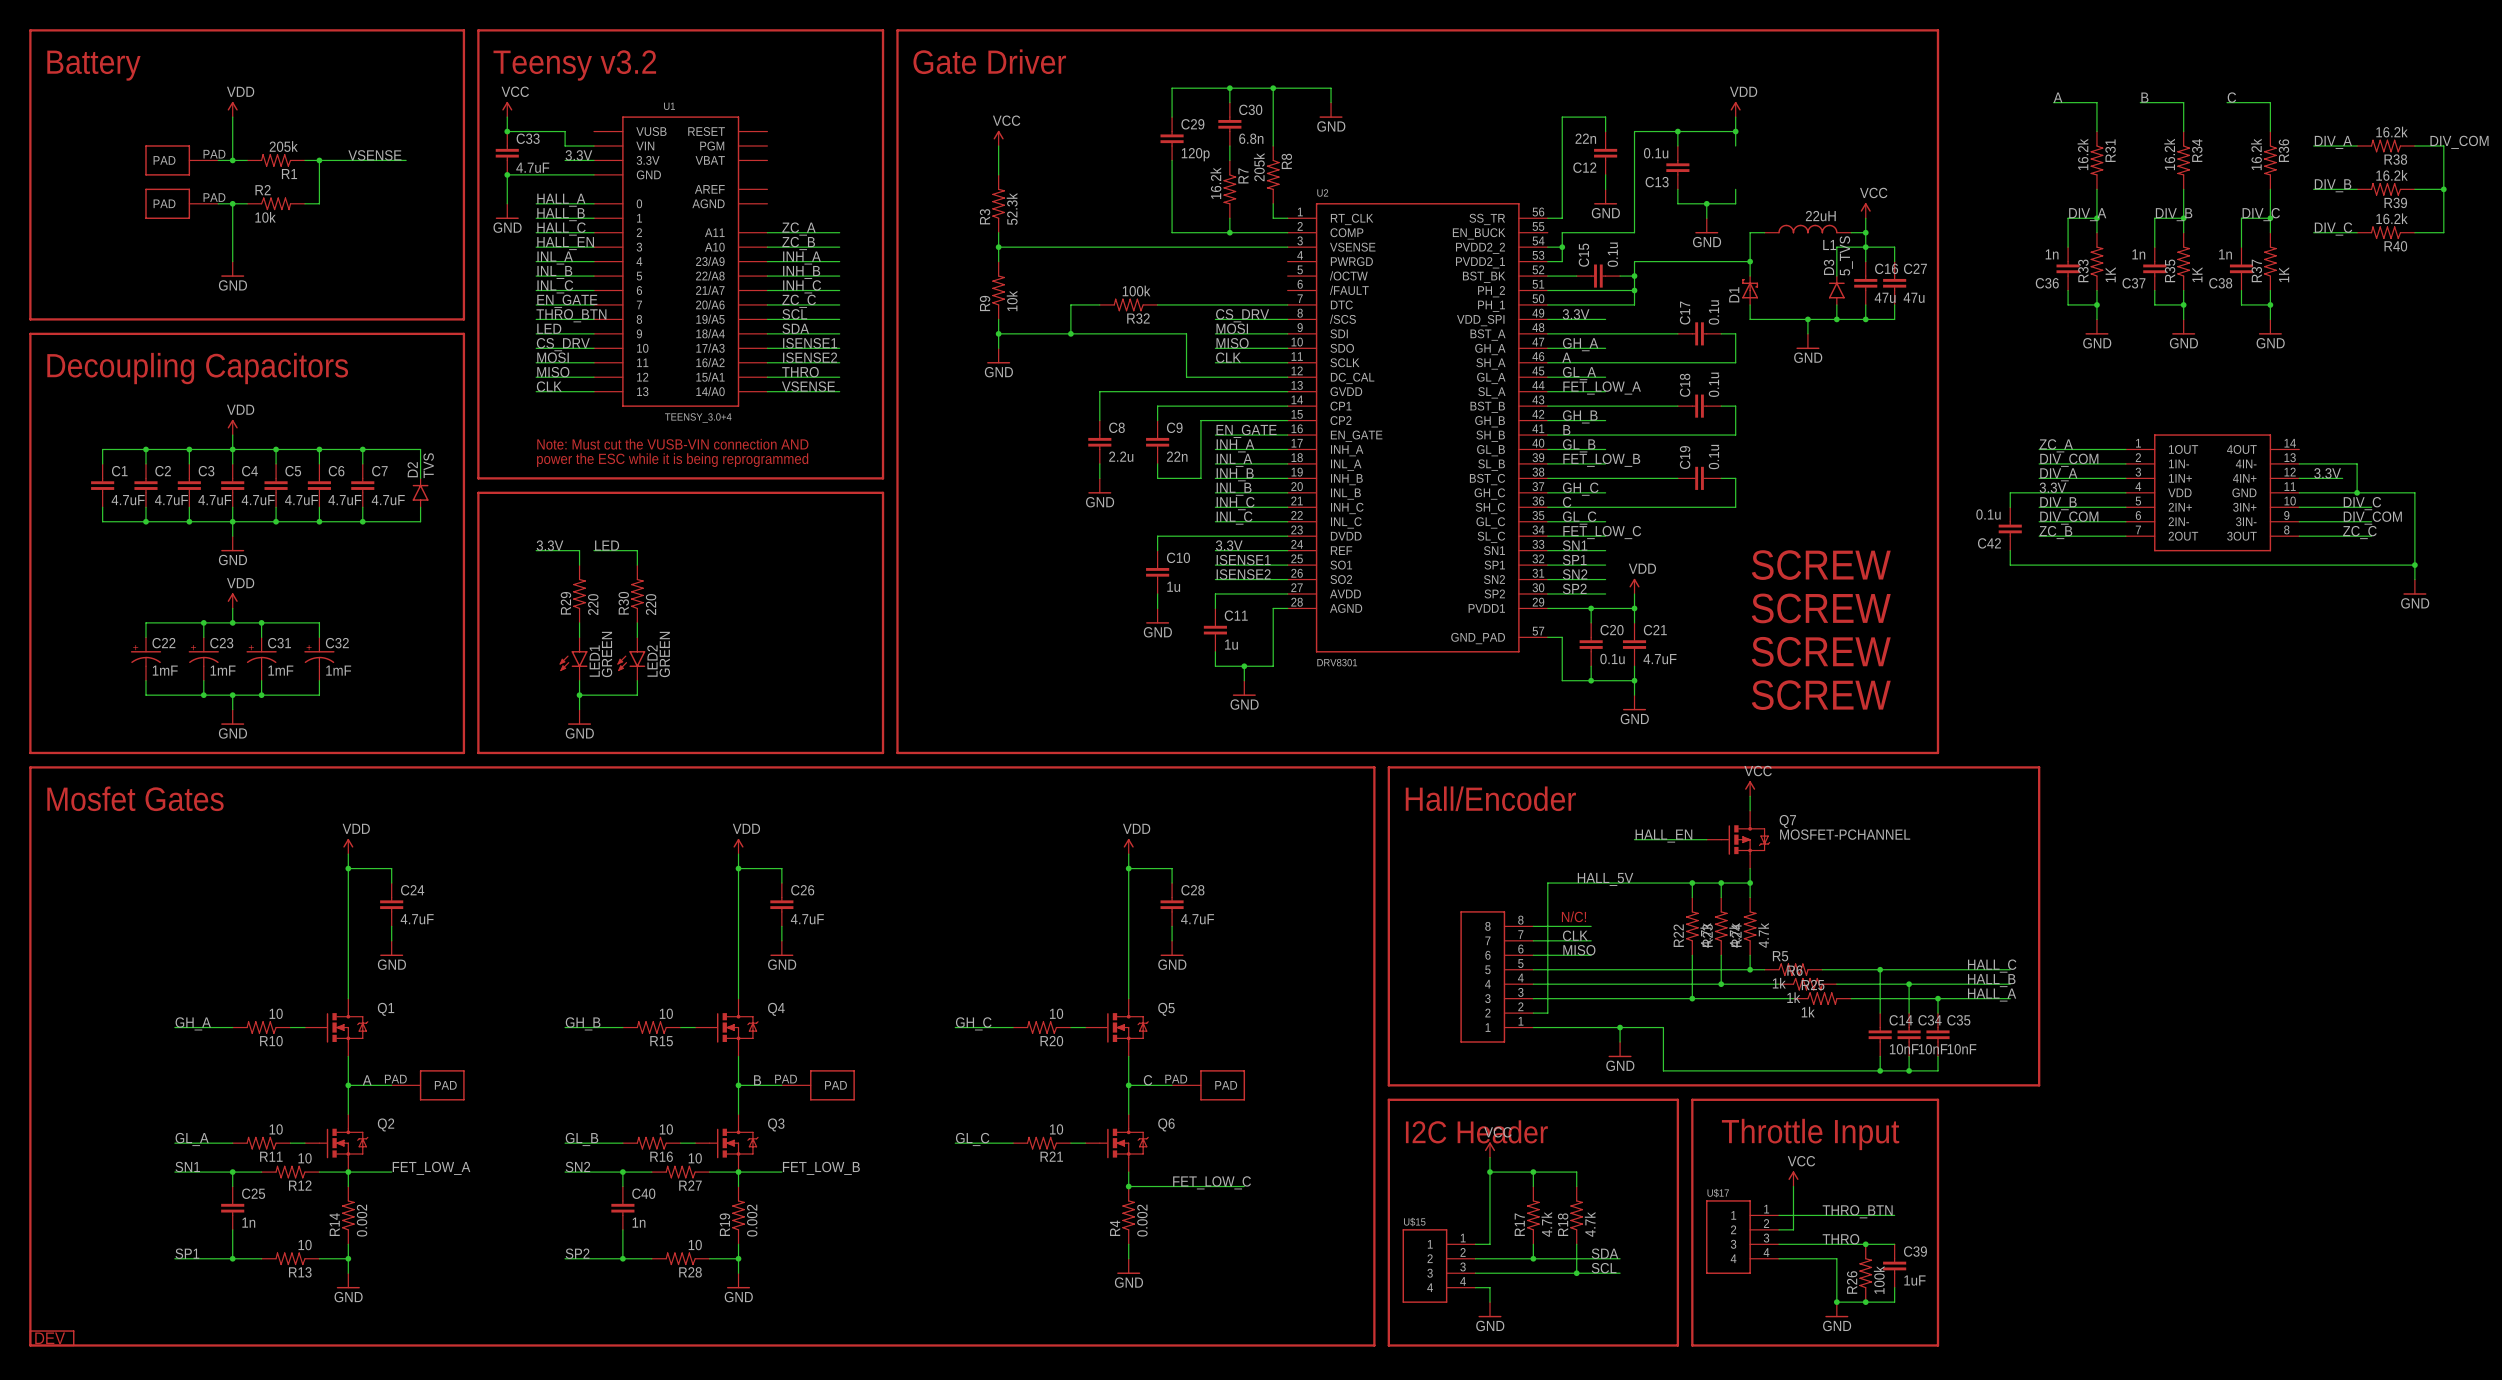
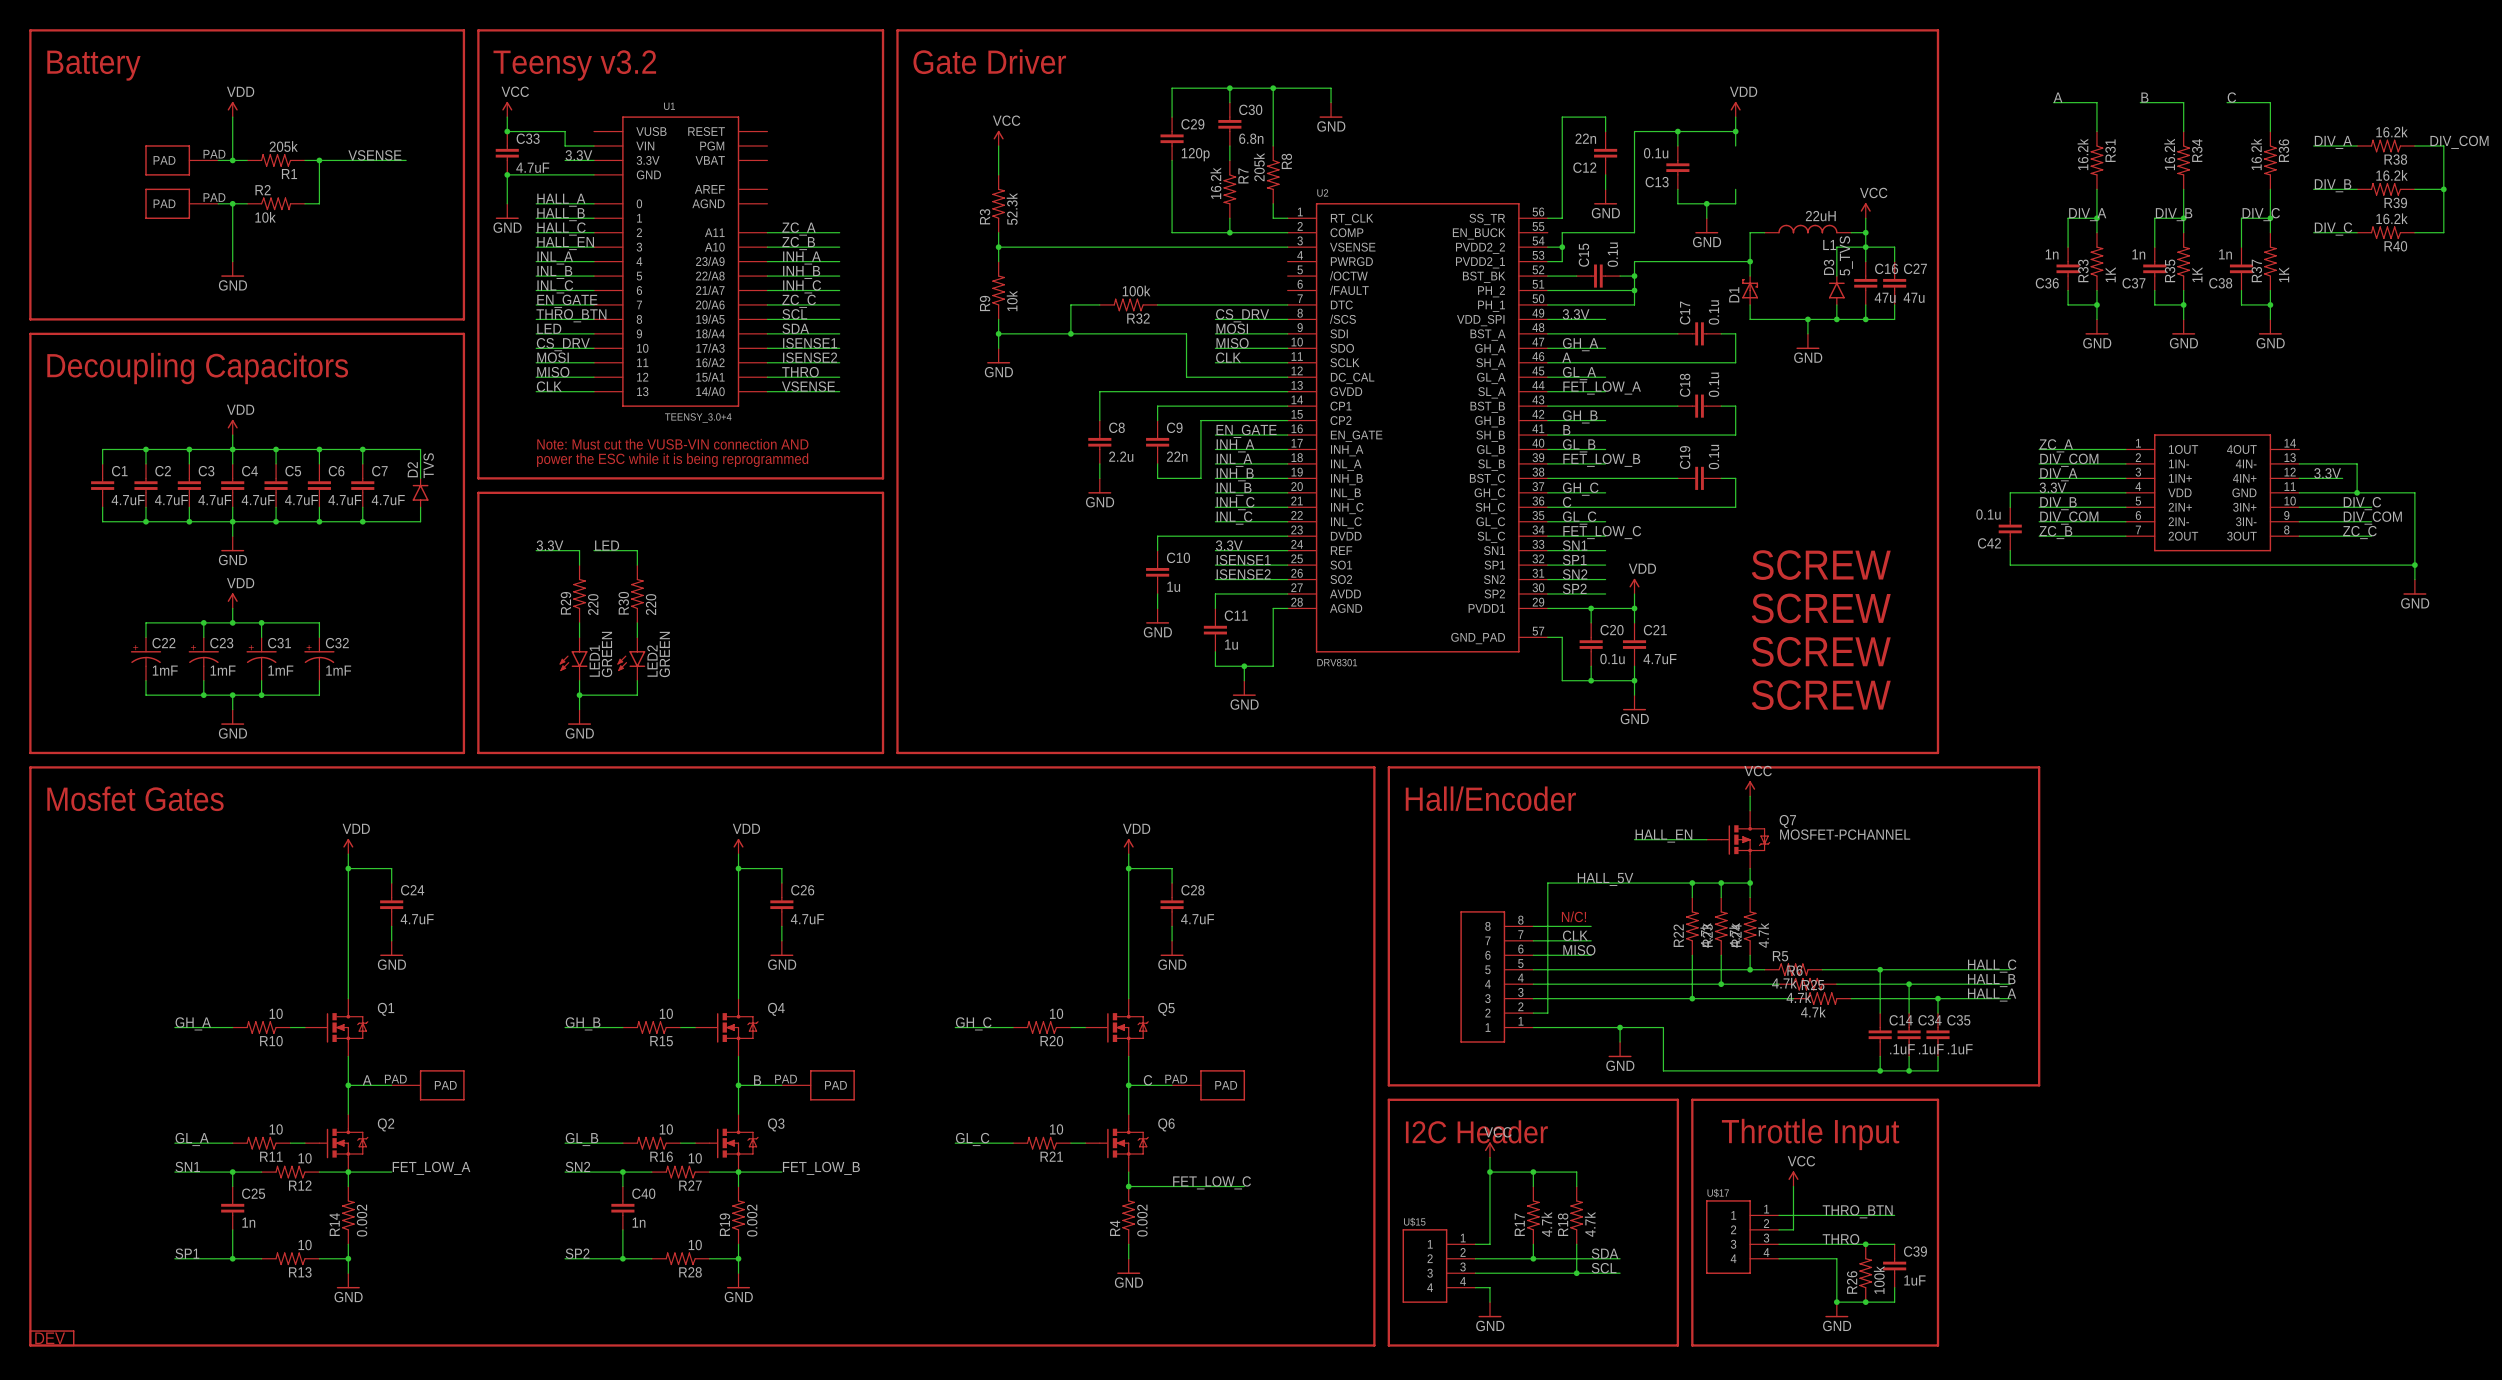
R5 value: 1k (1779, 983) -> 4.7k (1784, 983)
R6 value: 1k (1793, 997) -> 4.7k (1798, 997)
R25 value: 1k (1808, 1012) -> 4.7k (1813, 1012)
C14 value: 10nF (1904, 1049) -> .1uF (1902, 1049)
C34 value: 10nF (1933, 1049) -> .1uF (1931, 1049)
C35 value: 10nF (1961, 1049) -> .1uF (1960, 1049)

